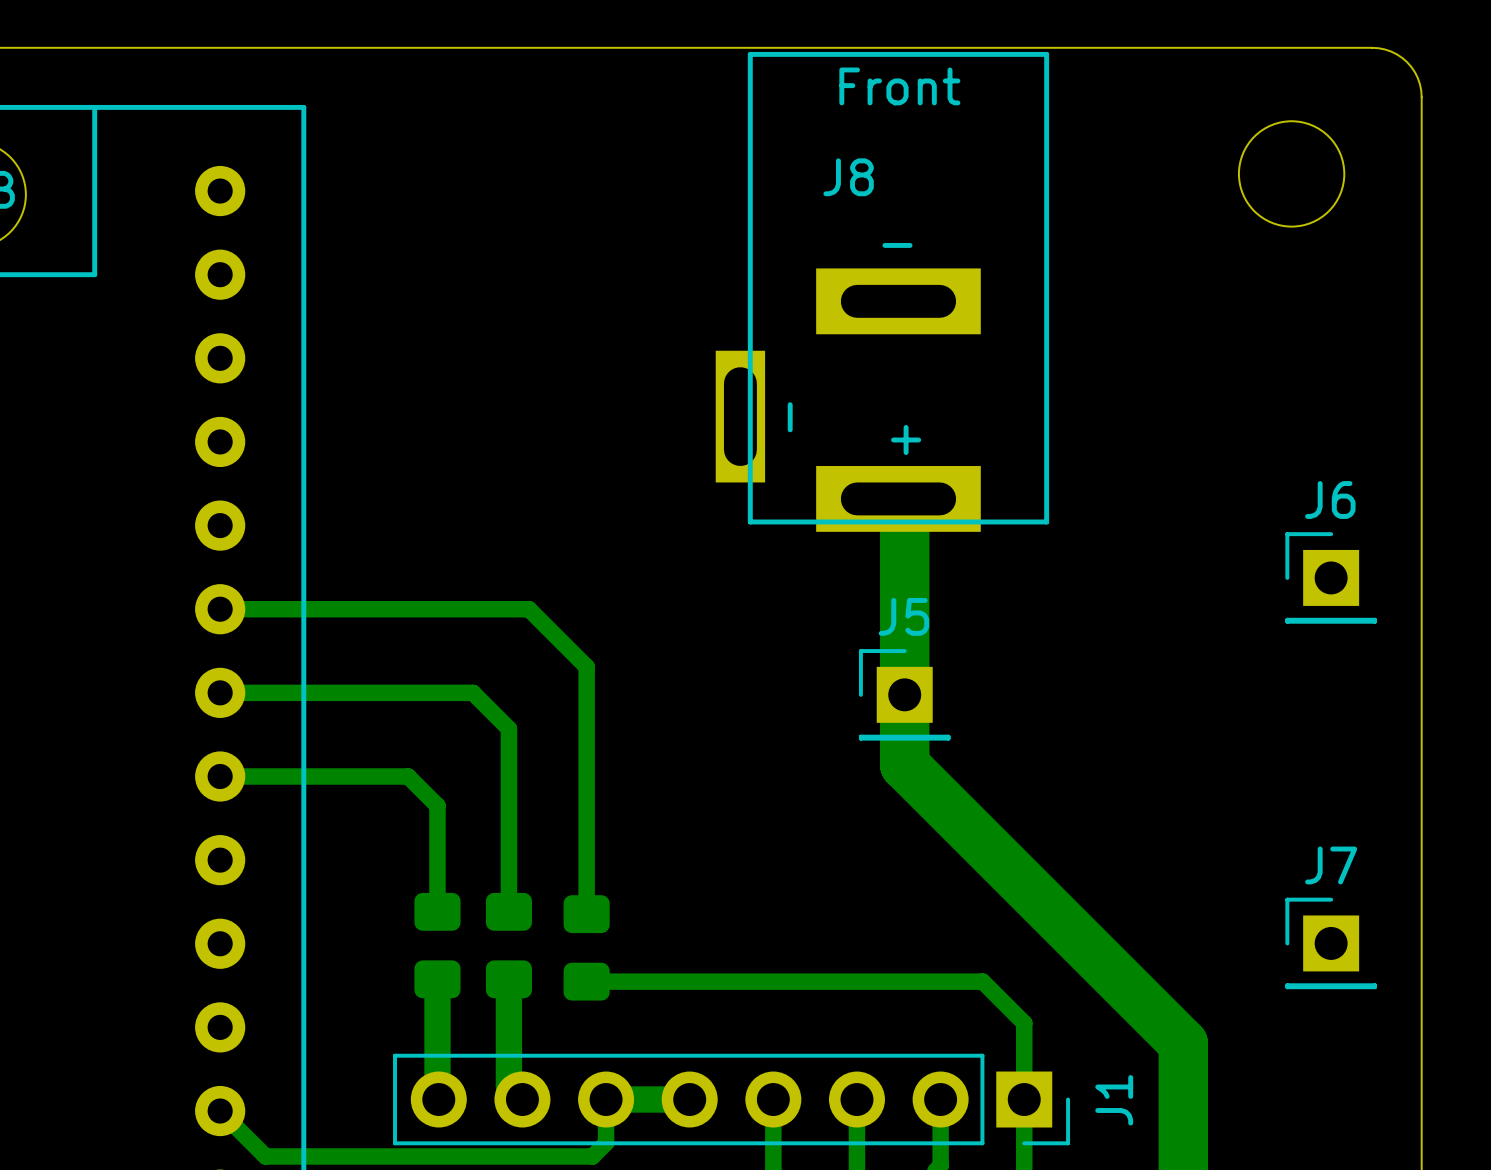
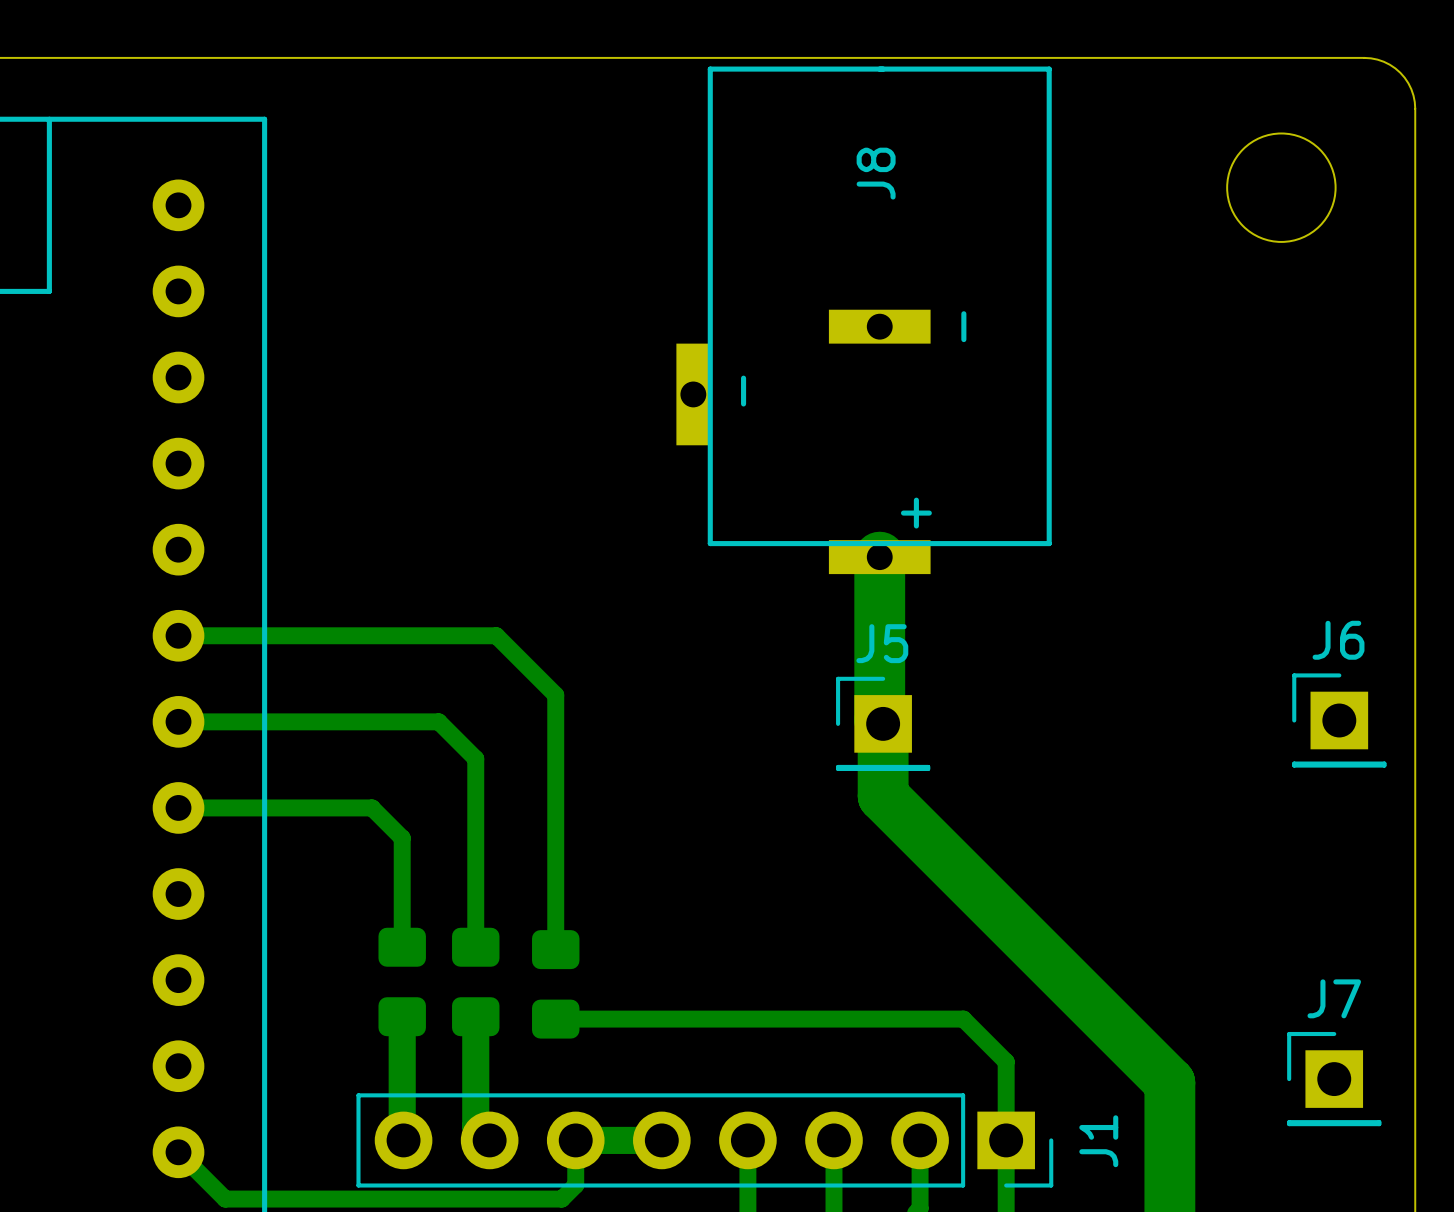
J8 footprint: [715, 51, 1050, 532] -> [676, 66, 1052, 575]
bottom track: (899, 497) (904, 503) (904, 694) -> (879, 557) (879, 720) (883, 723)
J6 position: (1331, 577) -> (1339, 720)
J7 position: (1331, 943) -> (1334, 1079)

